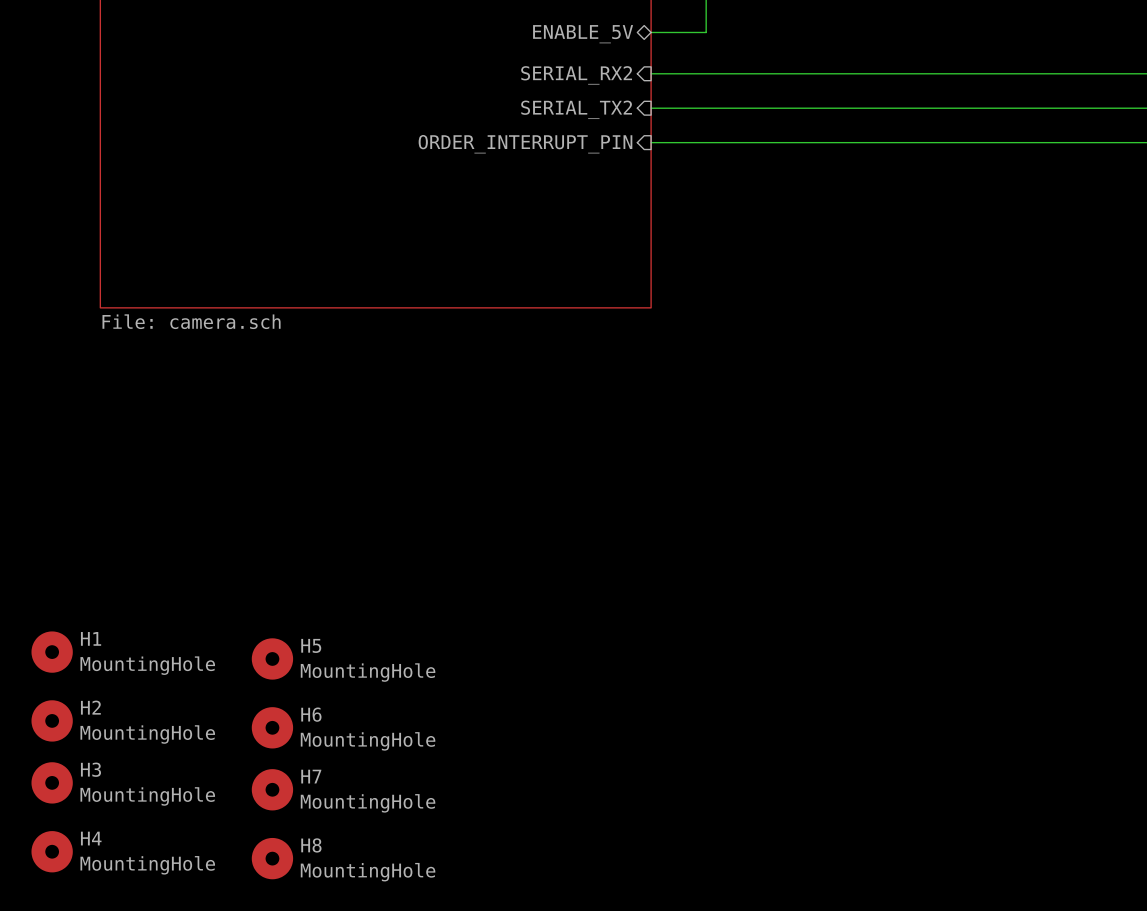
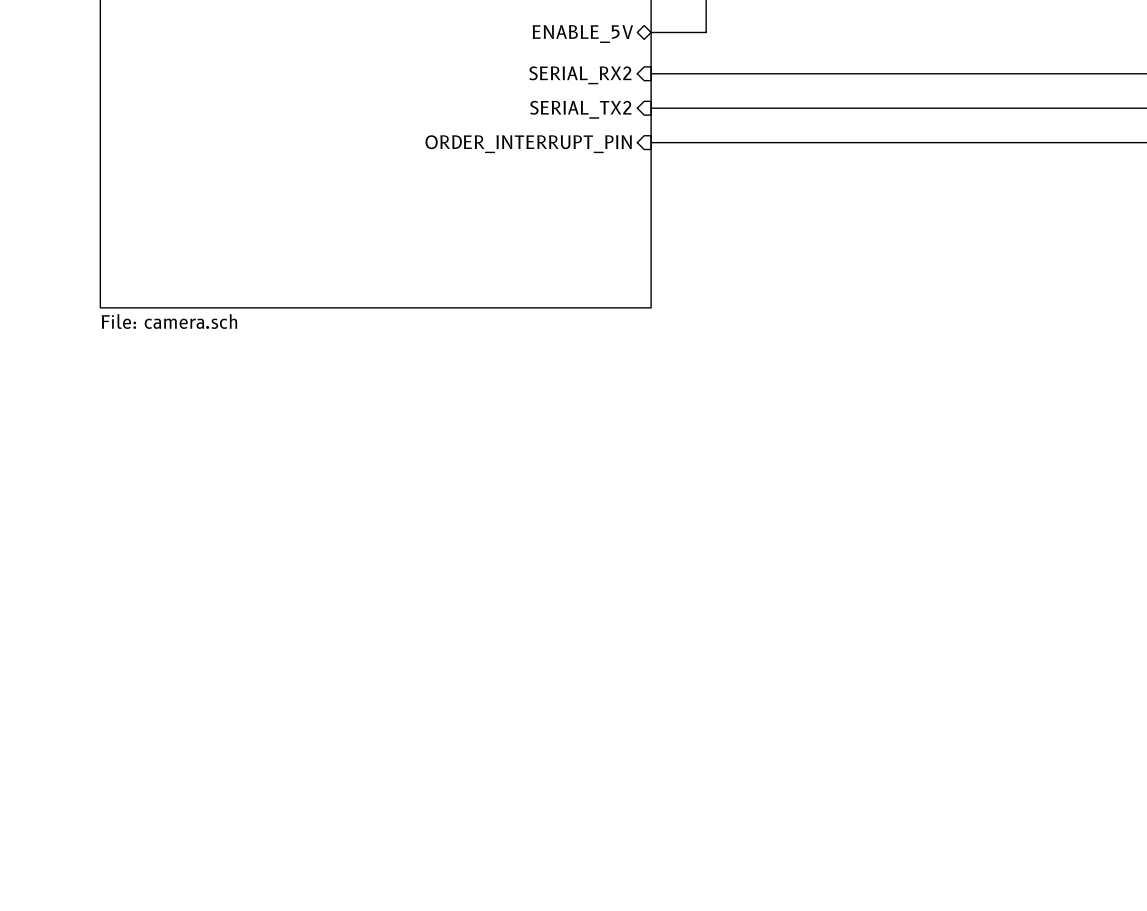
H1: MountingHole (52, 652) -> none
H5: MountingHole (272, 658) -> none
H2: MountingHole (52, 720) -> none
H6: MountingHole (272, 727) -> none
H3: MountingHole (52, 782) -> none
H7: MountingHole (272, 789) -> none
H4: MountingHole (52, 851) -> none
H8: MountingHole (272, 858) -> none

